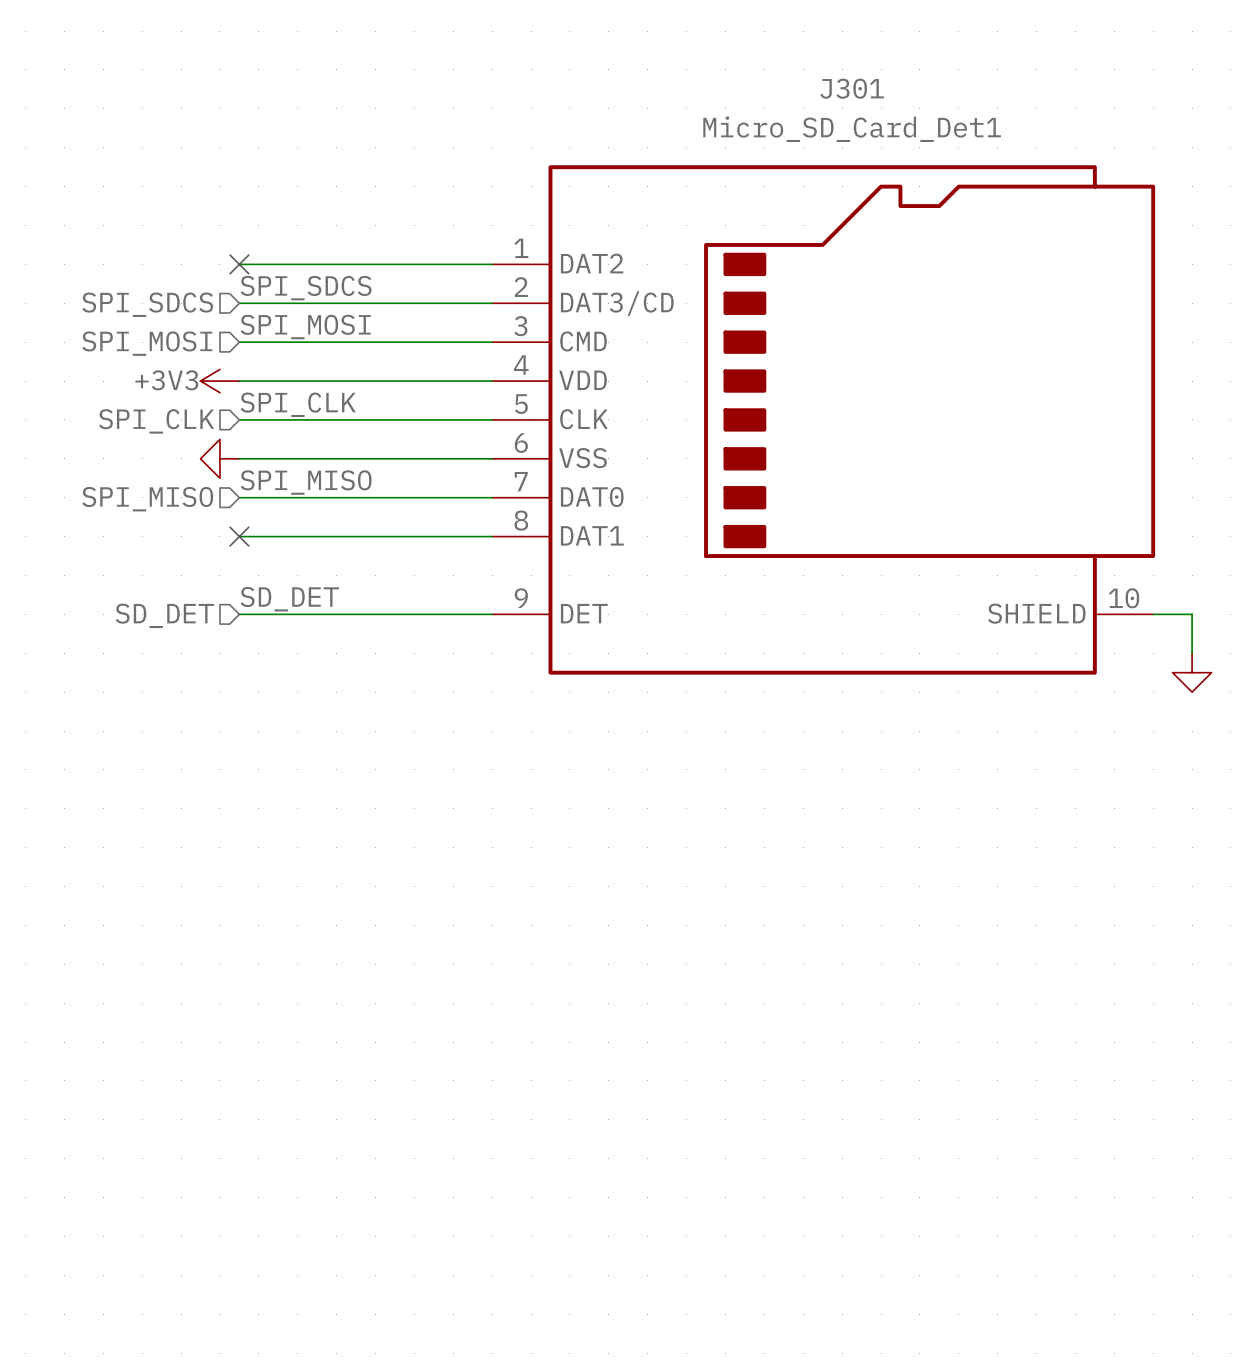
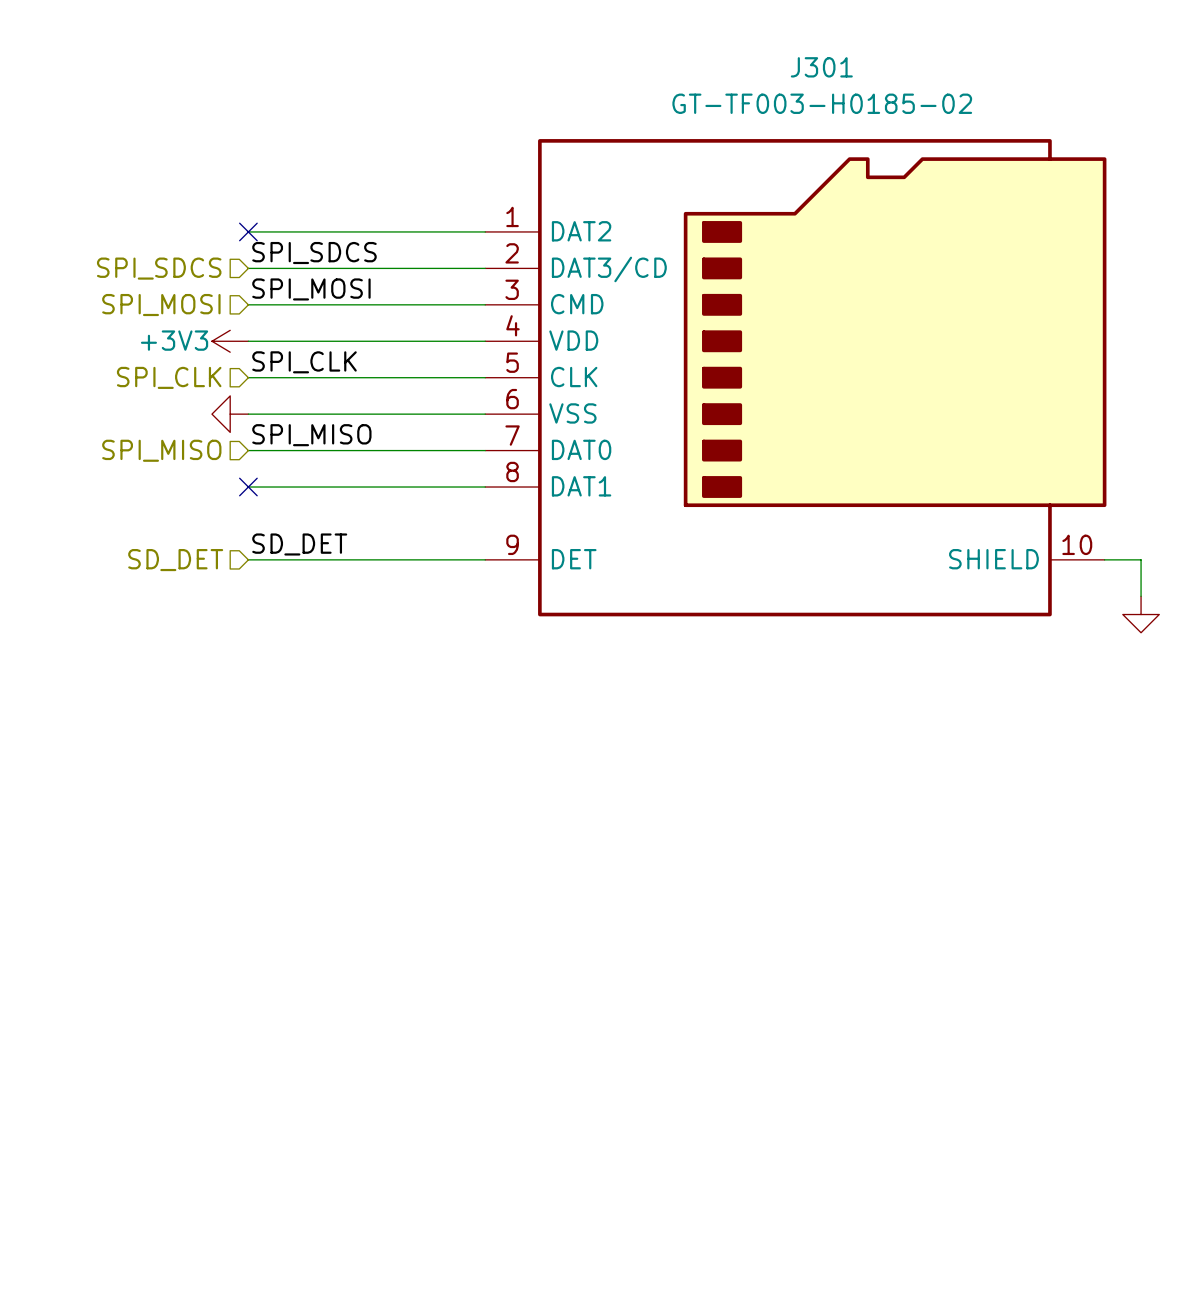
J301 value: Micro_SD_Card_Det1 (852, 129) -> GT-TF003-H0185-02 (822, 103)

